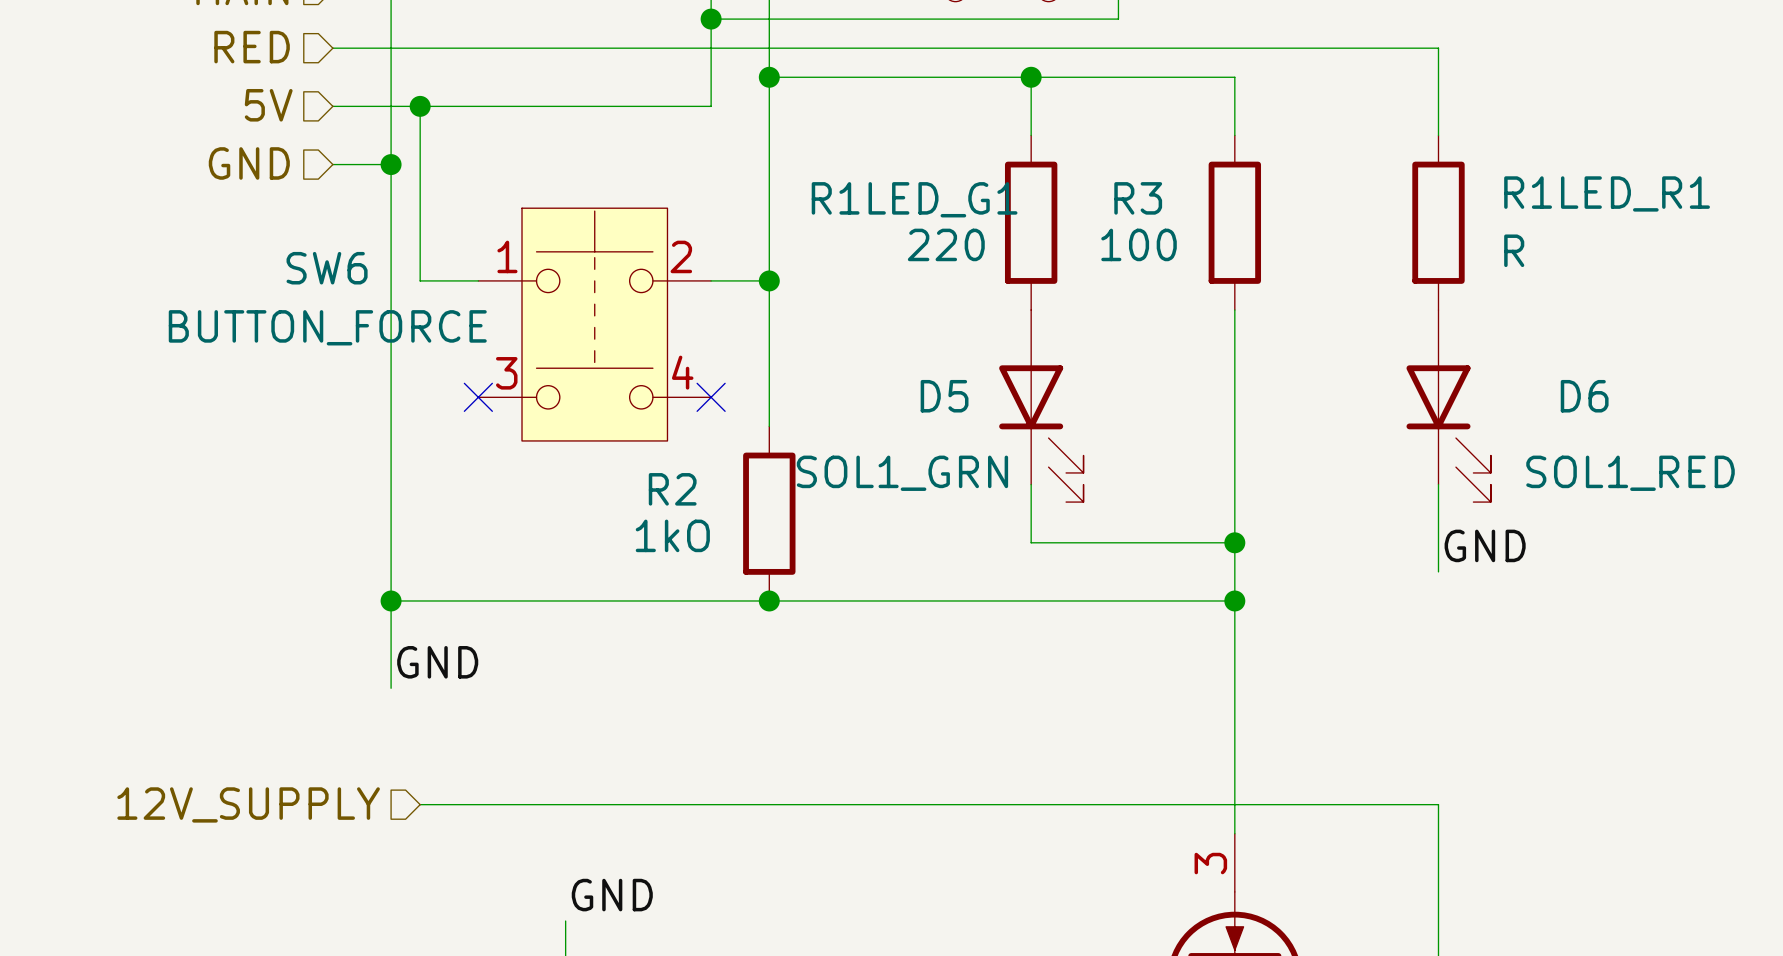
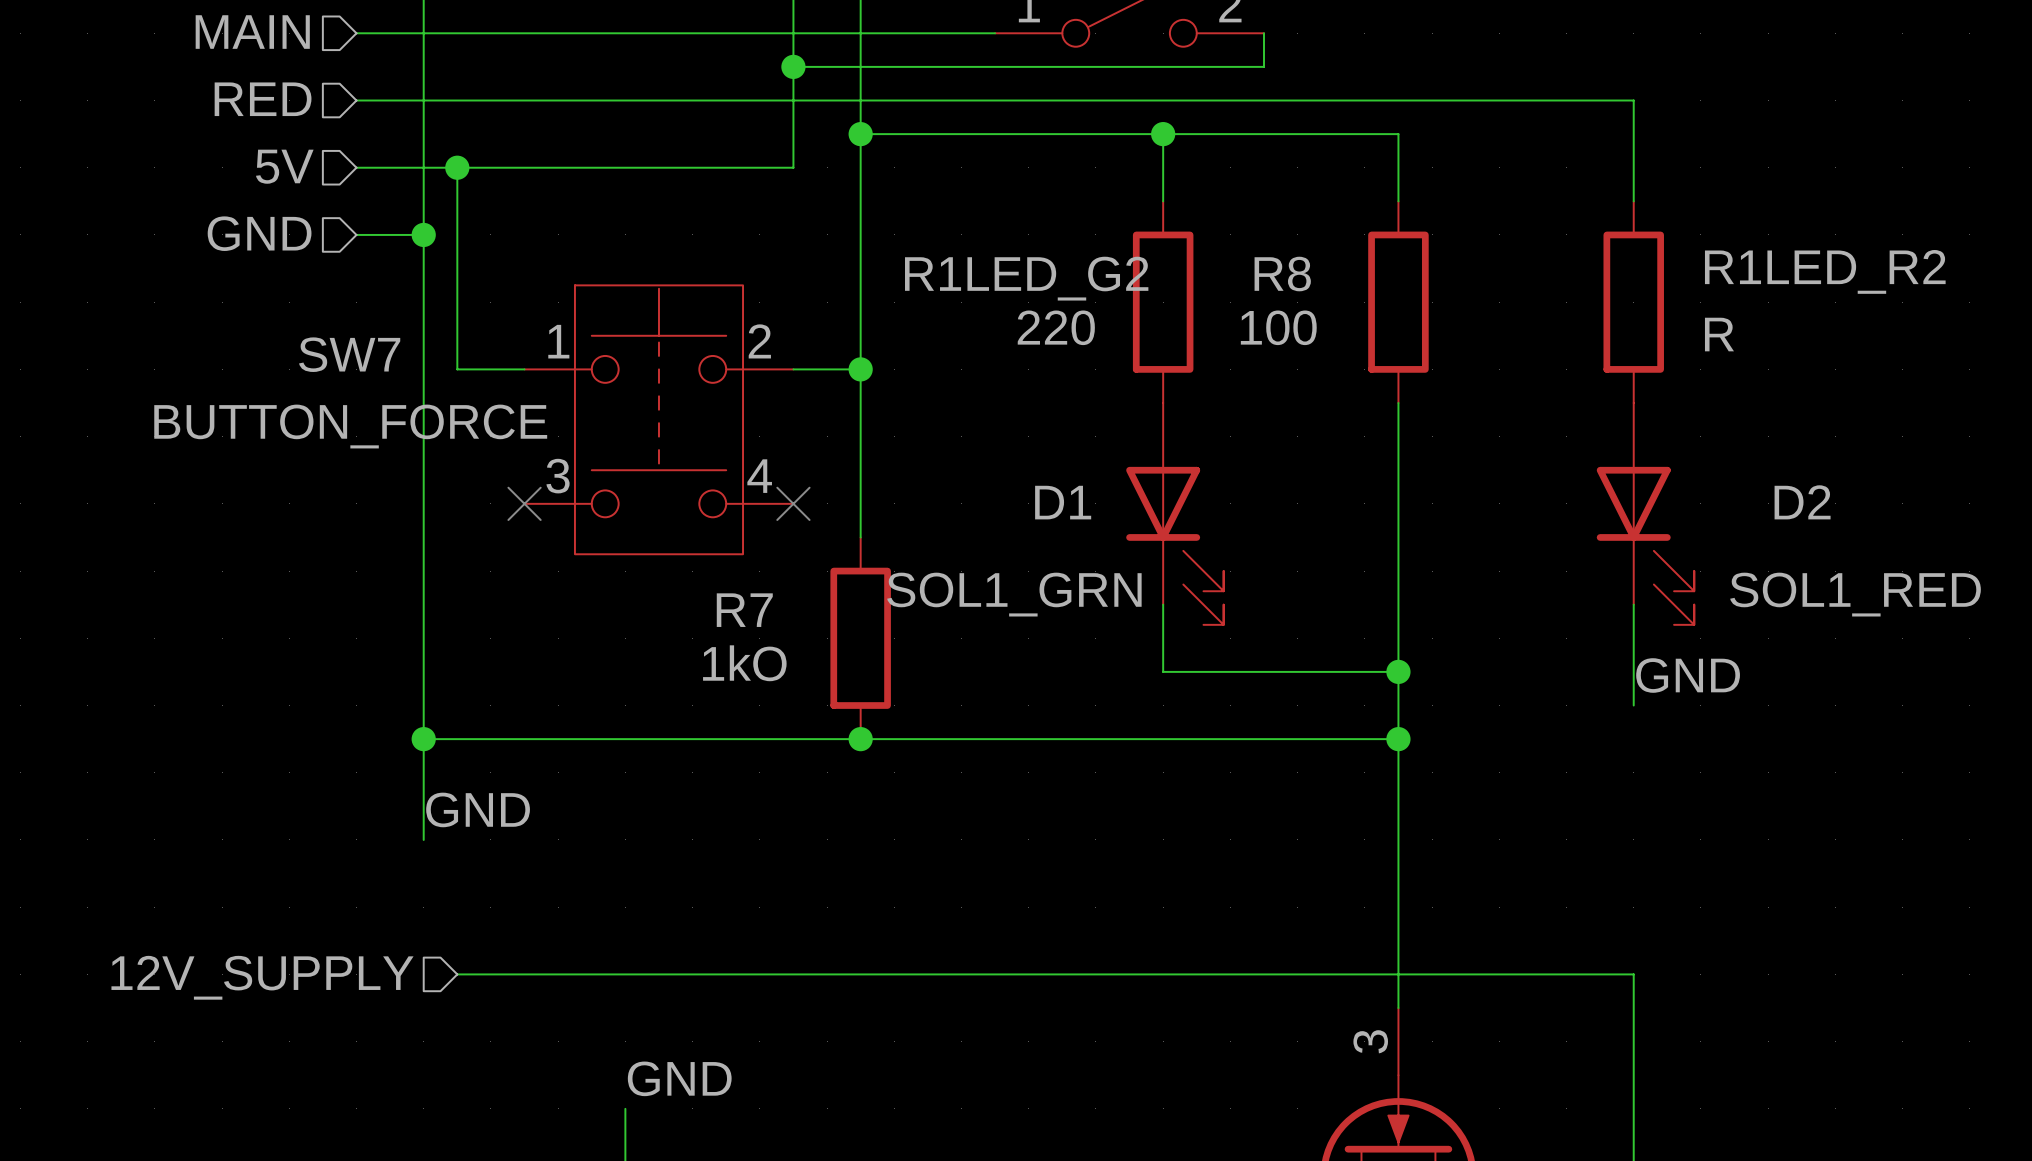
R1LED_R1 name: R1LED_R1 (1607, 193) -> R1LED_R2 (1825, 271)
R3 name: R3 (1138, 198) -> R8 (1282, 274)
R1LED_G1 name: R1LED_G1 (914, 199) -> R1LED_G2 (1026, 278)
SW6 name: SW6 (327, 268) -> SW7 (349, 354)
D5 name: D5 (944, 396) -> D1 (1063, 502)
D6 name: D6 (1584, 396) -> D2 (1802, 502)
R2 name: R2 (672, 489) -> R7 (744, 610)

